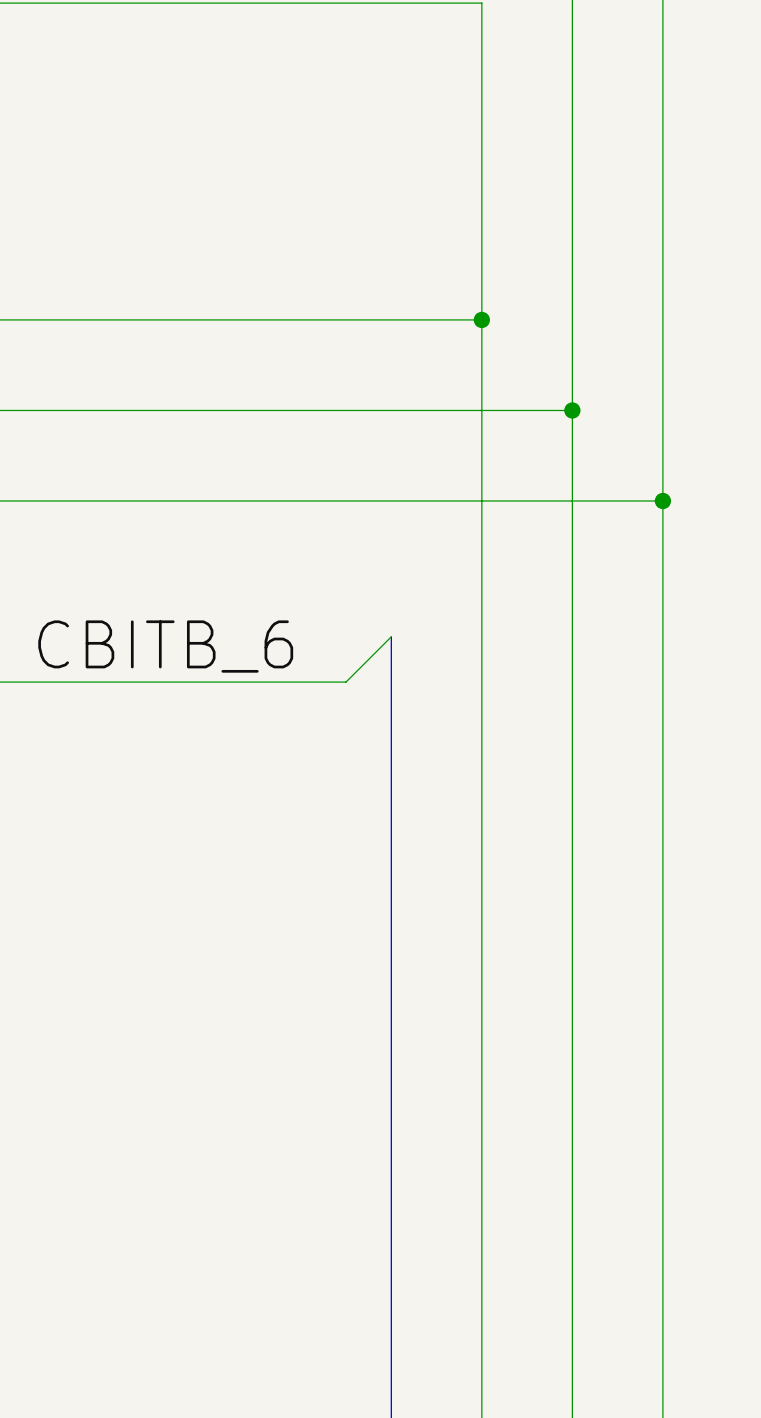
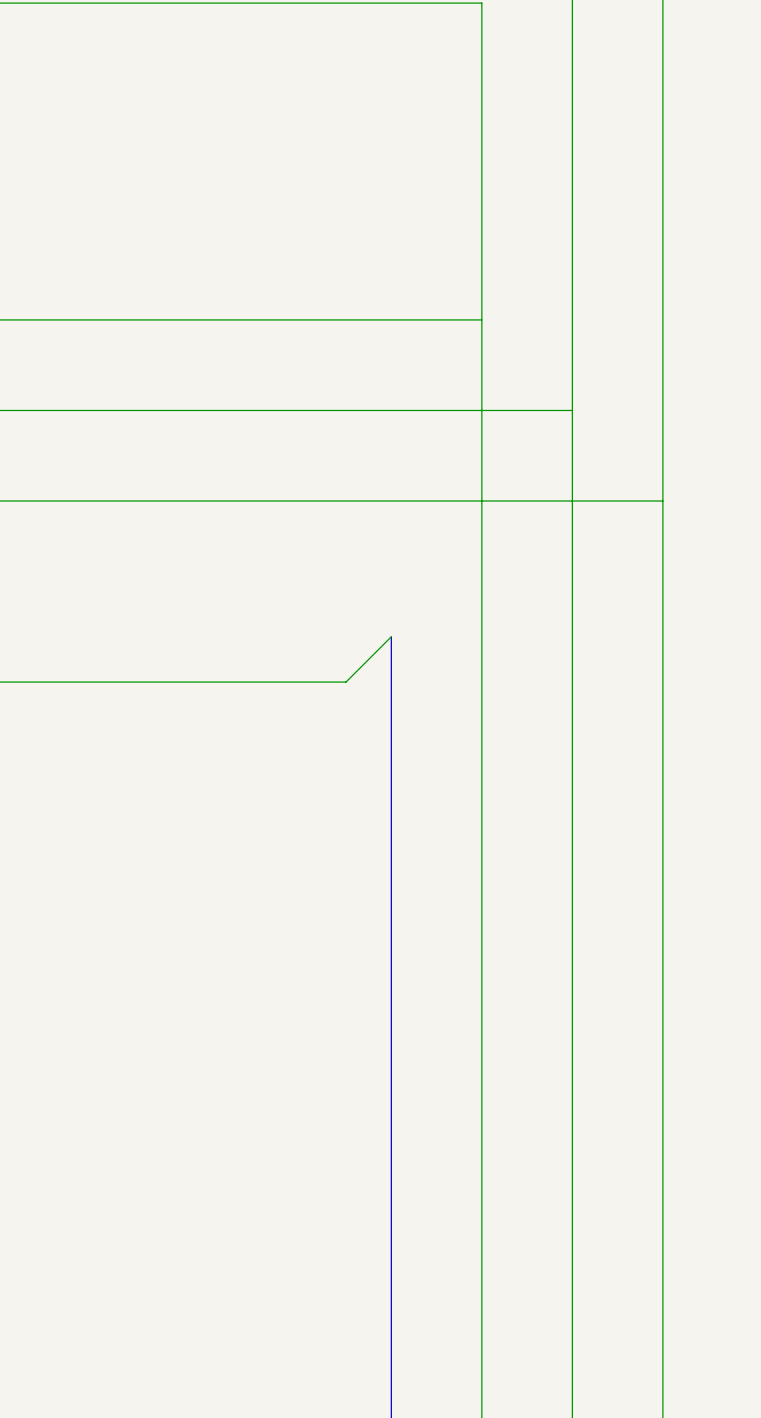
junction: (481, 319) -> none
junction: (572, 410) -> none
junction: (662, 501) -> none
label: CBITB_6 (165, 646) -> none

